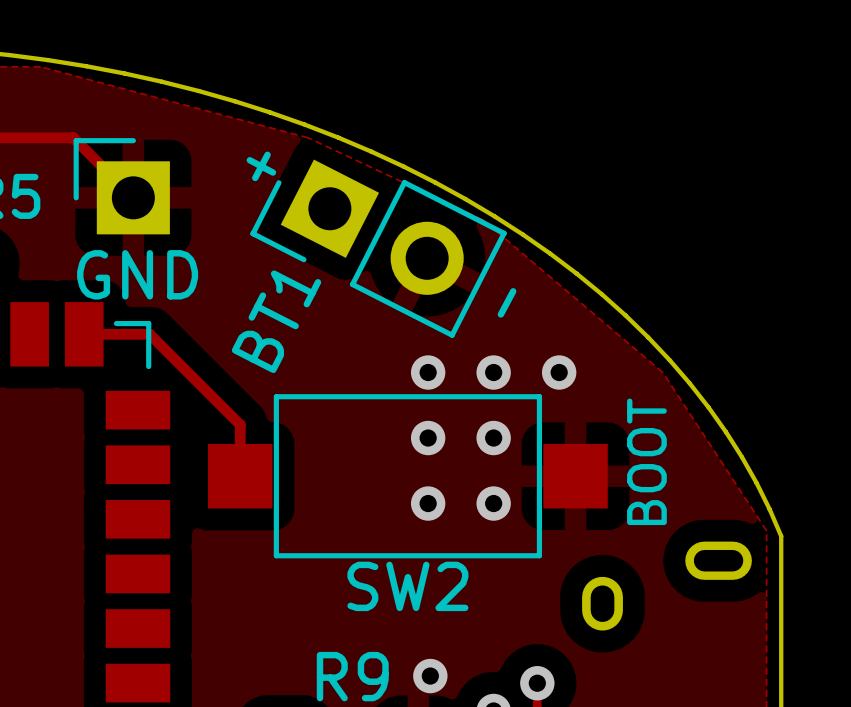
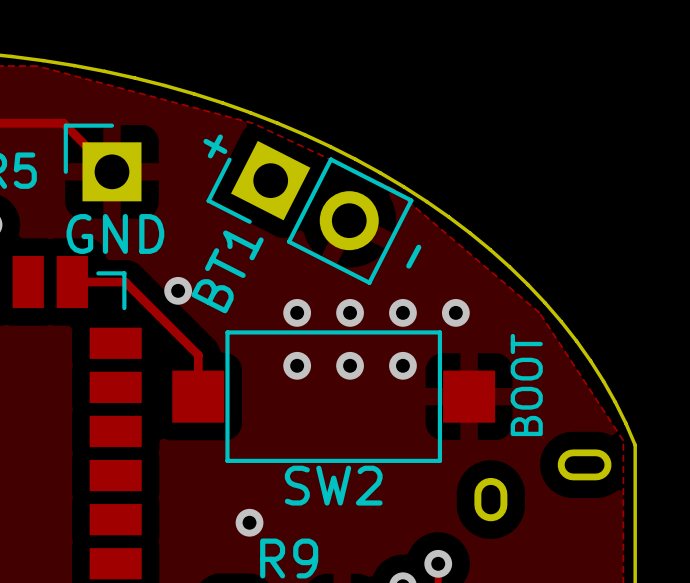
via: none -> (178, 290)
via: none -> (297, 312)
via: none -> (297, 365)
via: (428, 503) -> none
via: (493, 503) -> none
via: none -> (249, 522)
via: (430, 676) -> none

